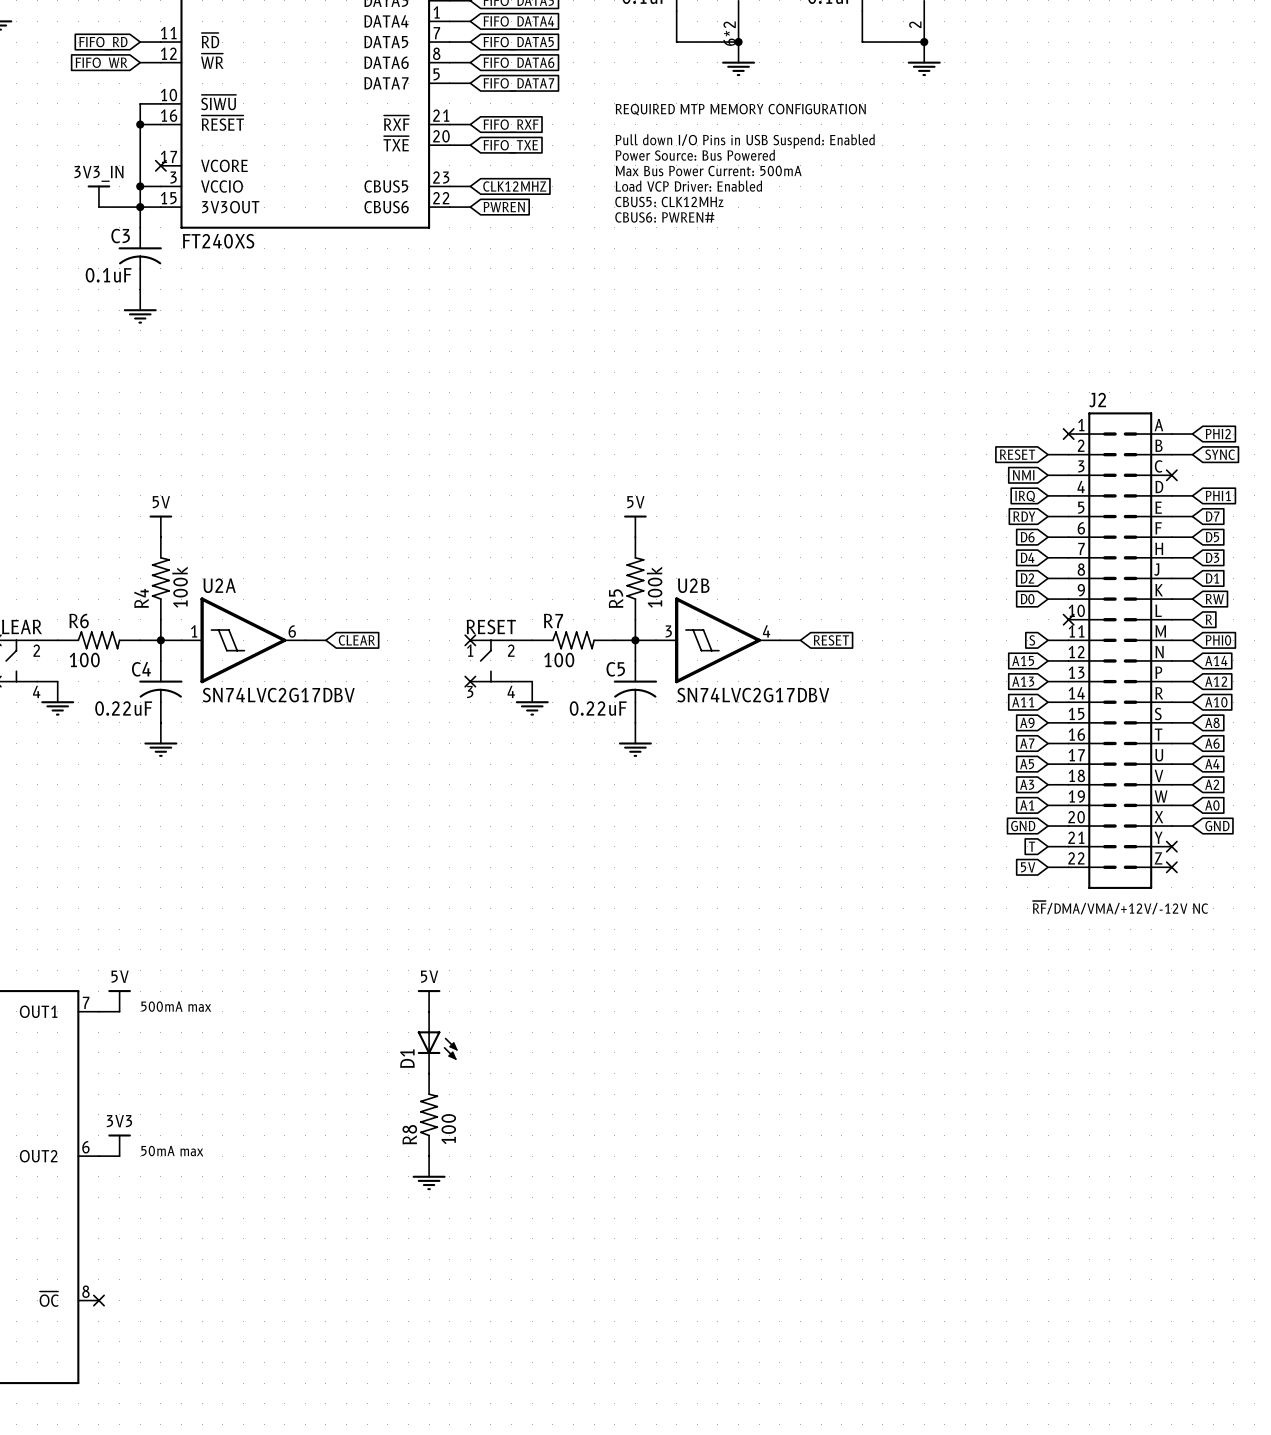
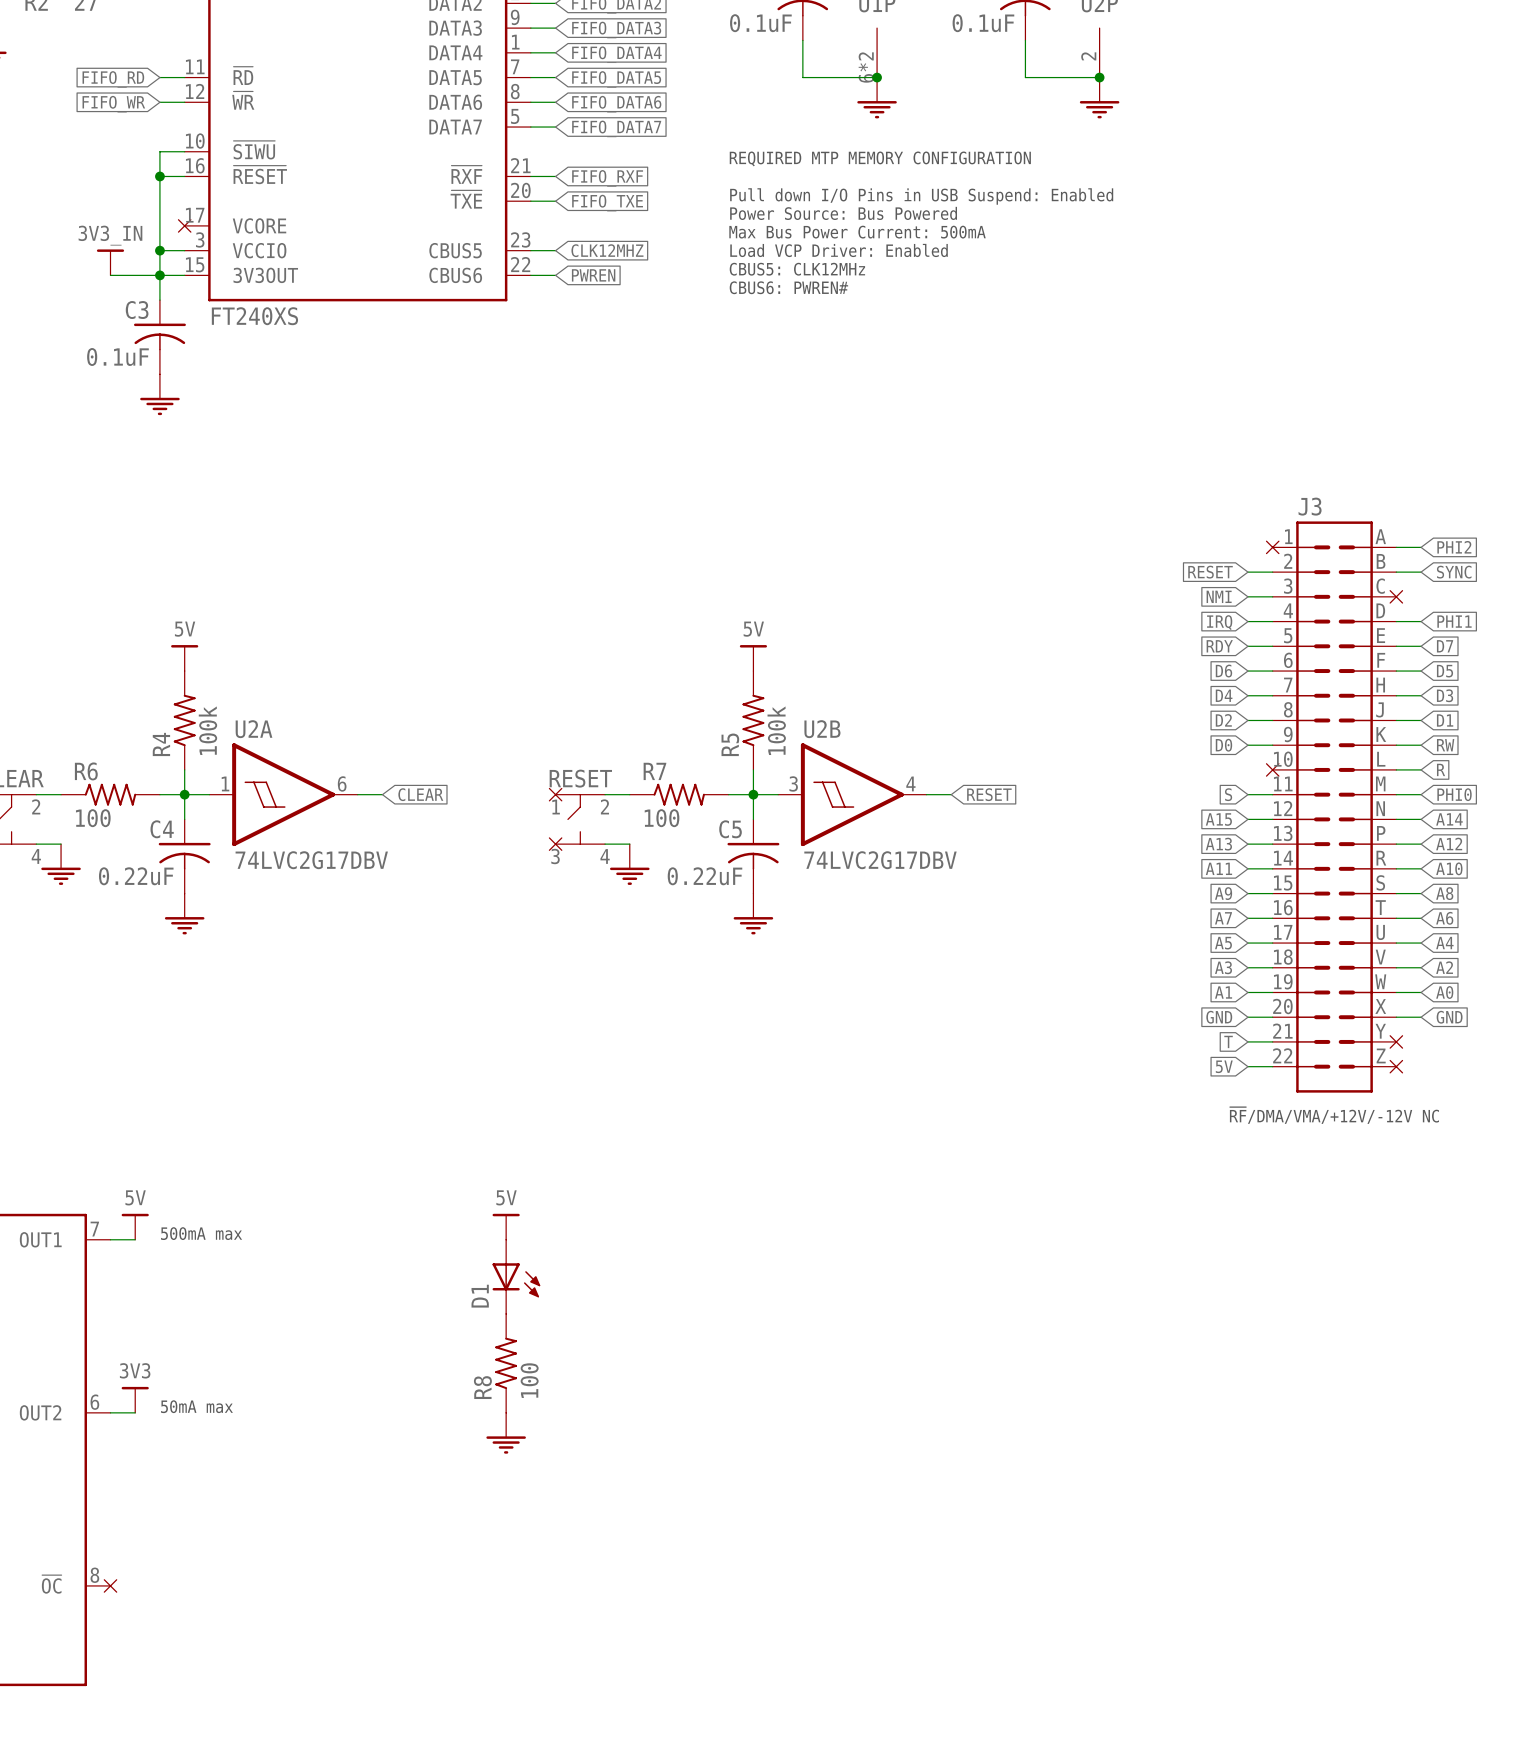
J2 name: J2 (1097, 400) -> J3 (1310, 506)
U2A value: SN74LVC2G17DBV (278, 695) -> 74LVC2G17DBV (311, 860)
U2B value: SN74LVC2G17DBV (753, 695) -> 74LVC2G17DBV (880, 860)

